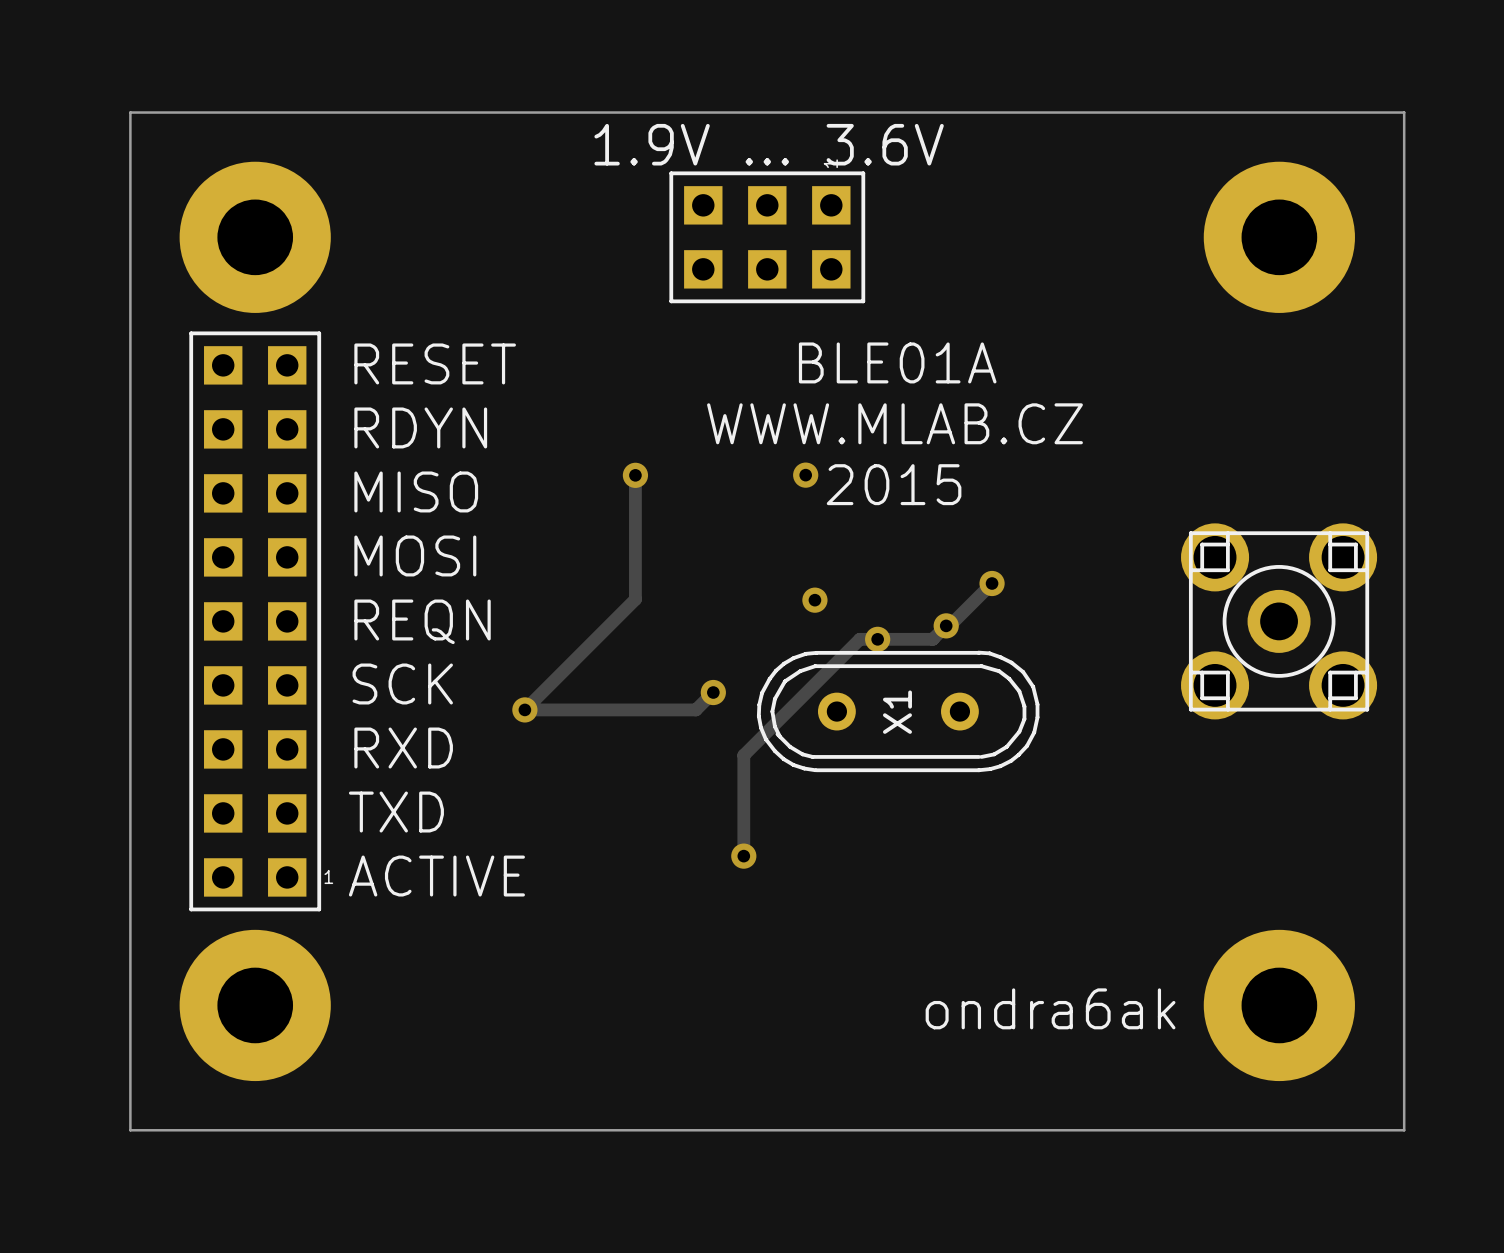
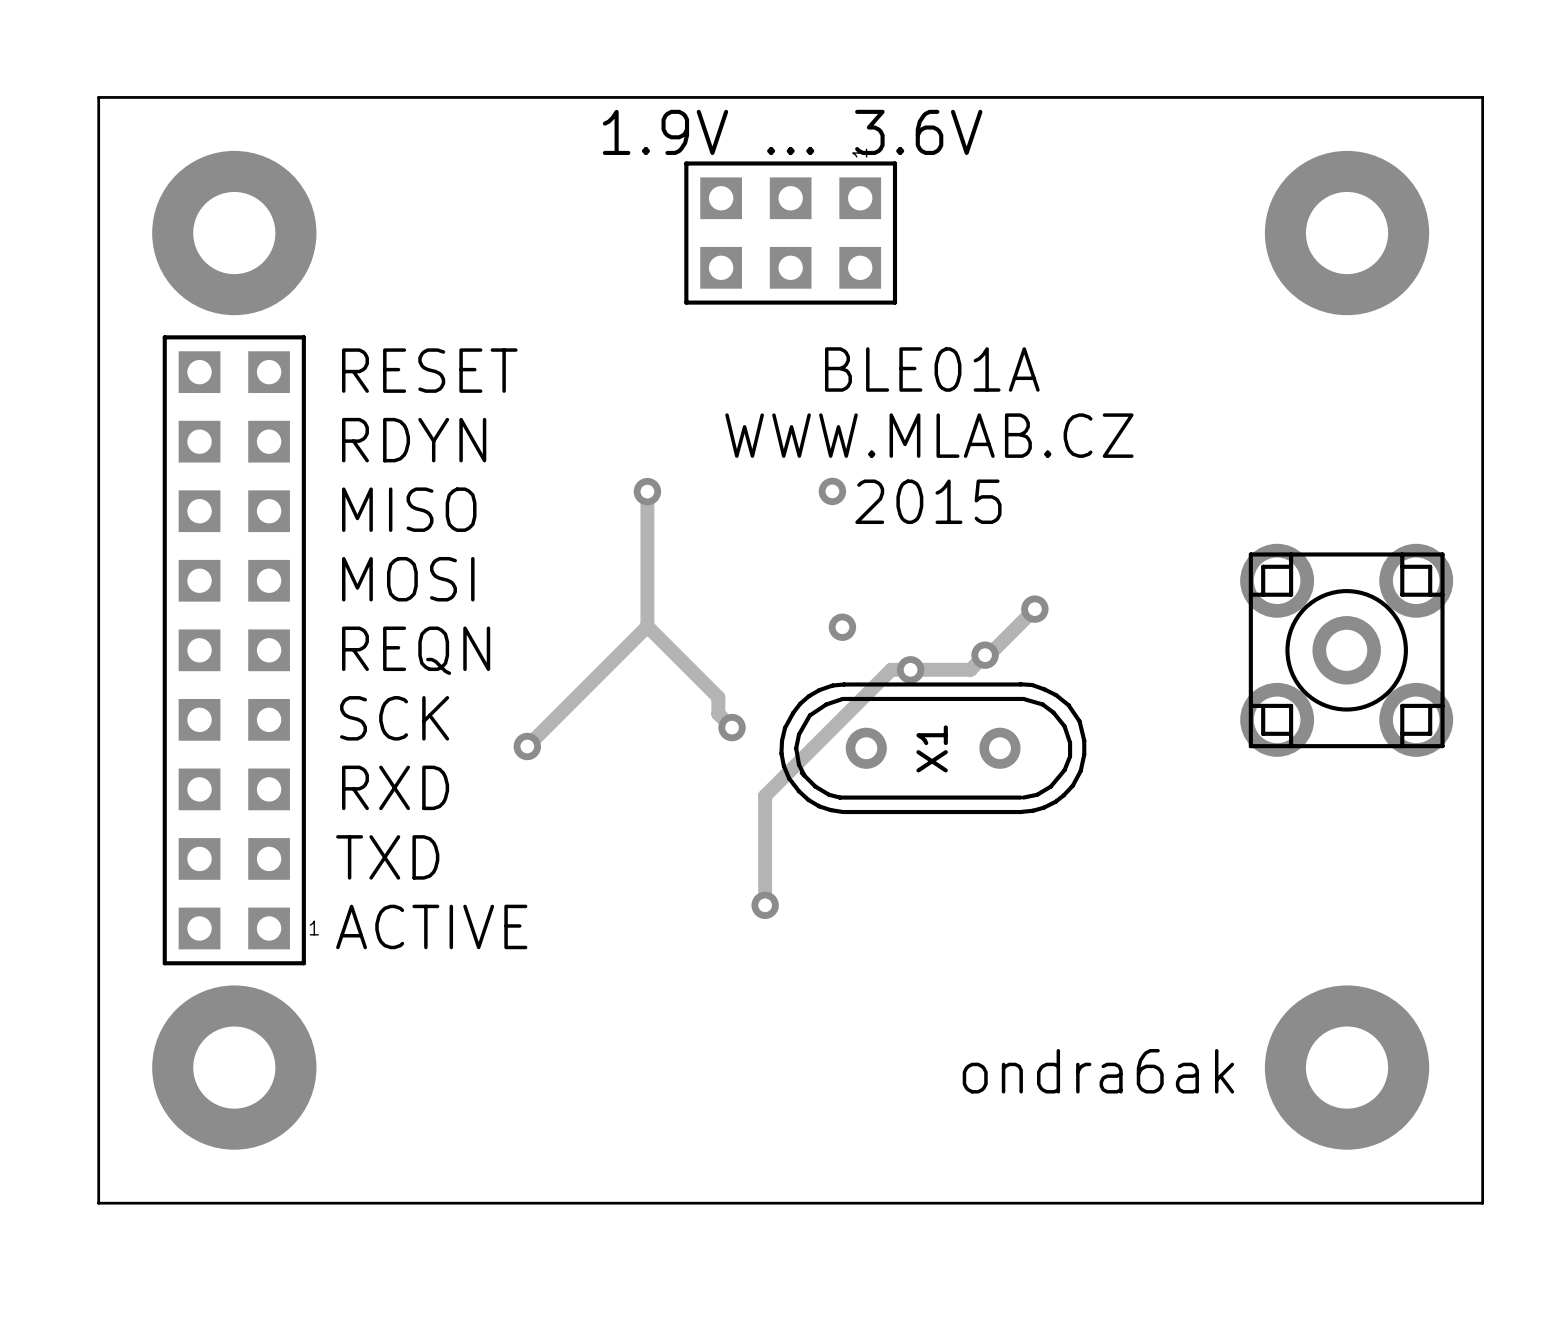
track: (713, 692) (695, 709) (524, 709) -> (732, 727) (718, 713) (718, 697) (647, 626)

